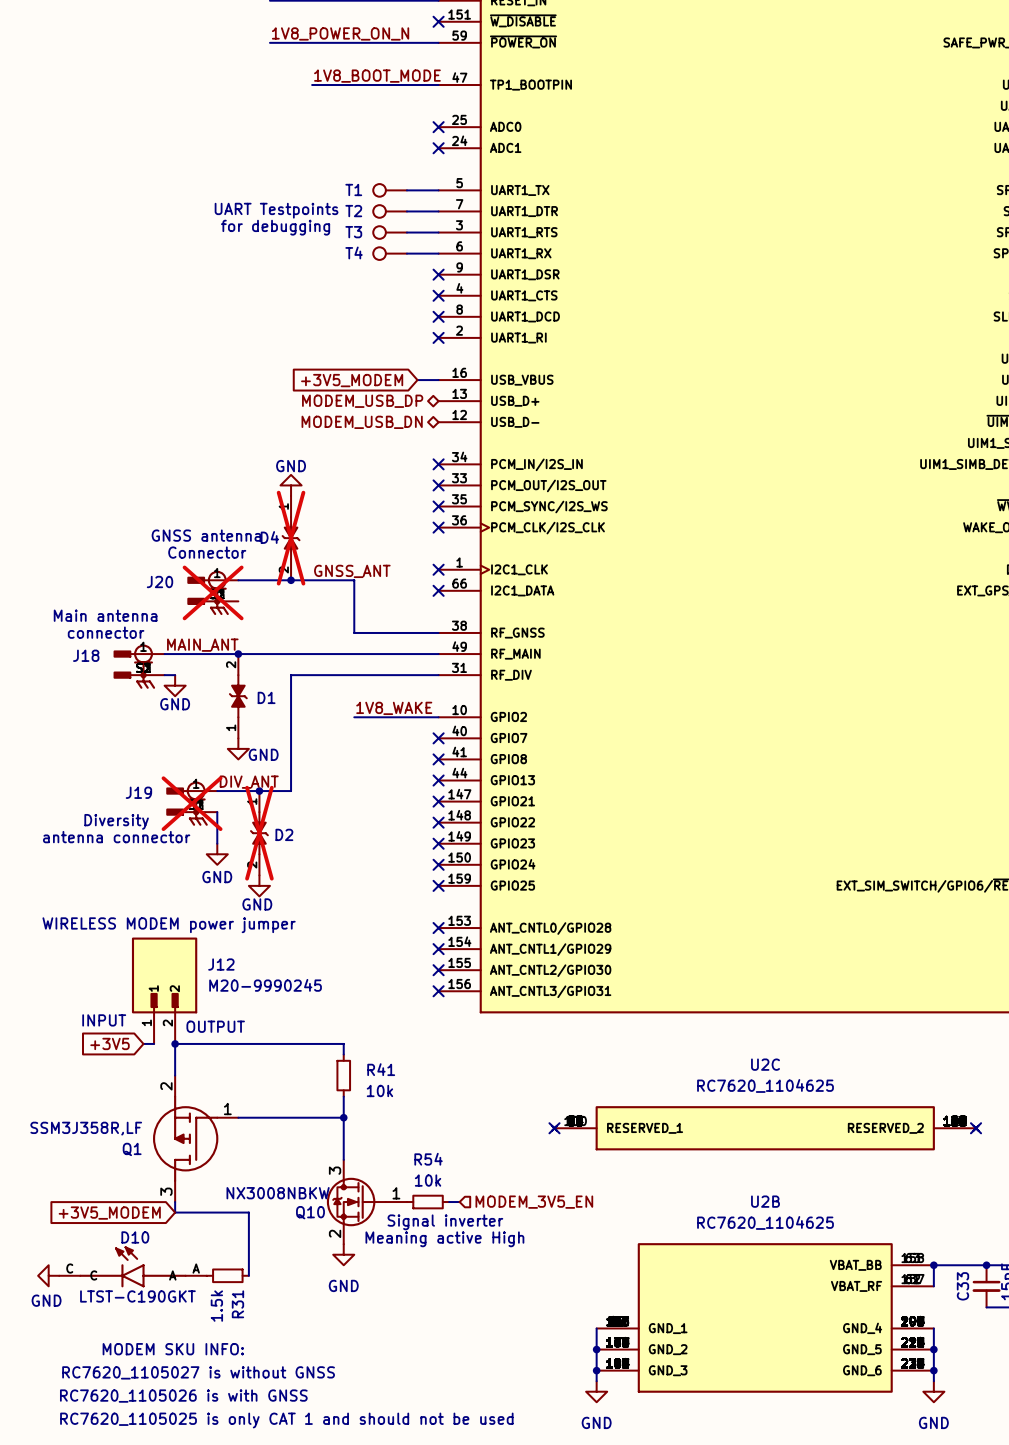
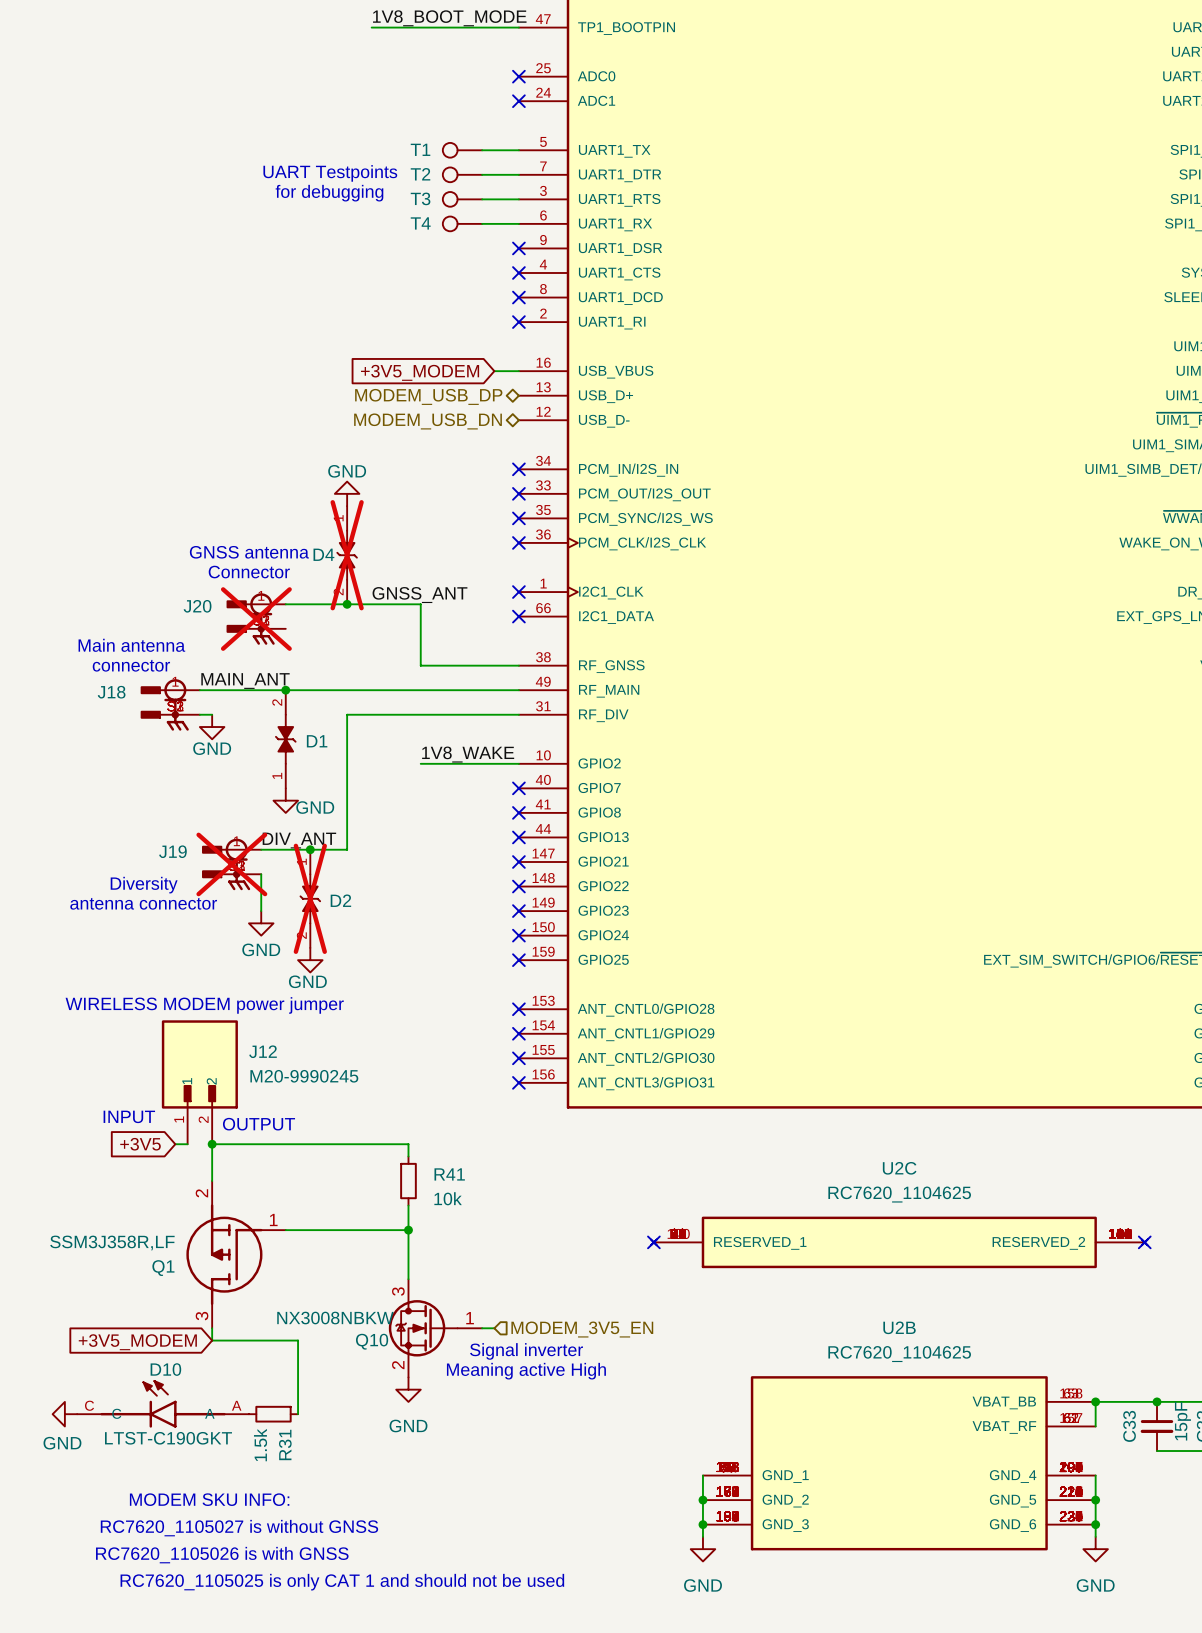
R54: 10k (428, 1202) -> none
hierarchical label position: MODEM_3V5_EN (534, 1202) -> MODEM_3V5_EN (582, 1329)

